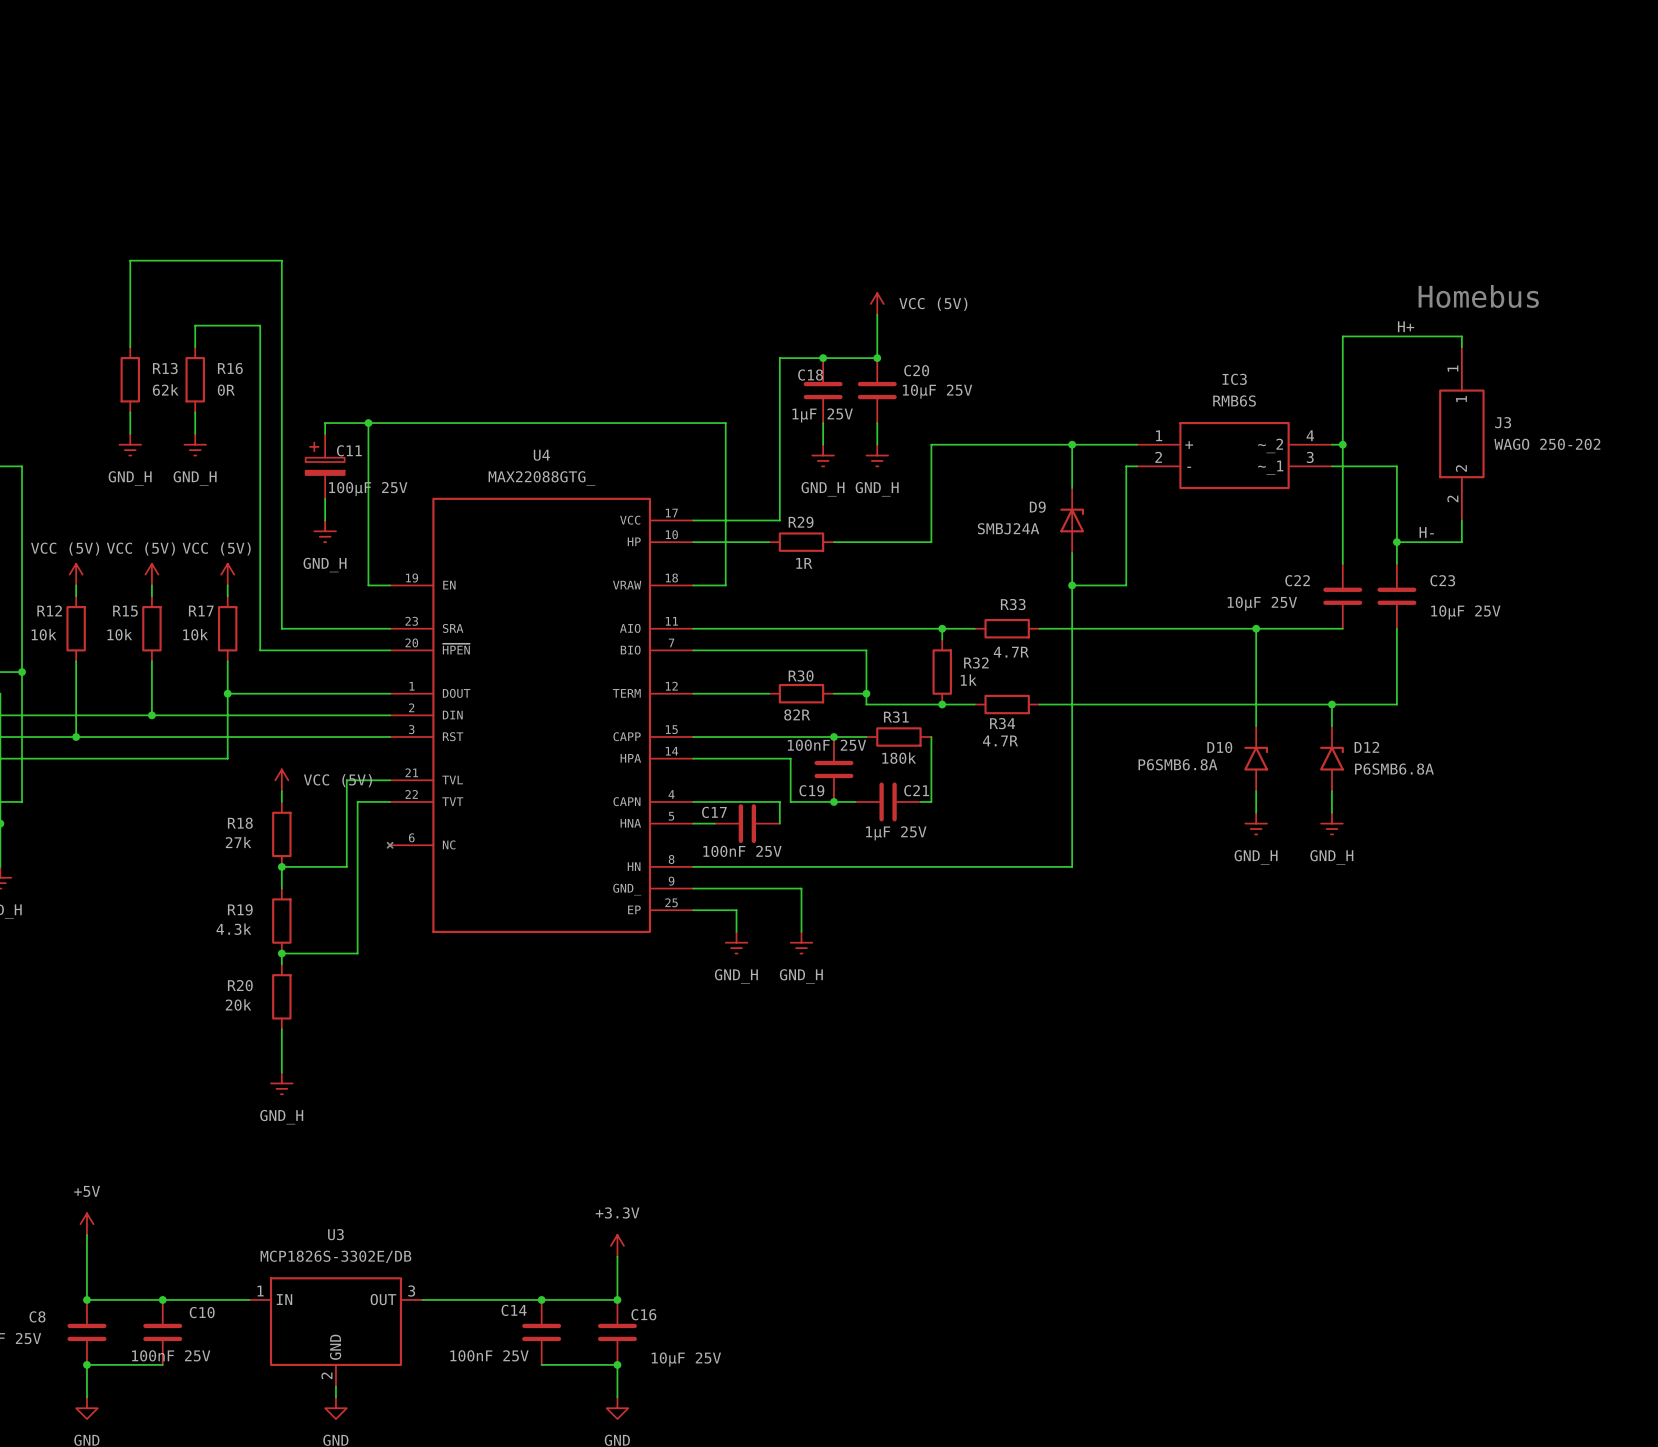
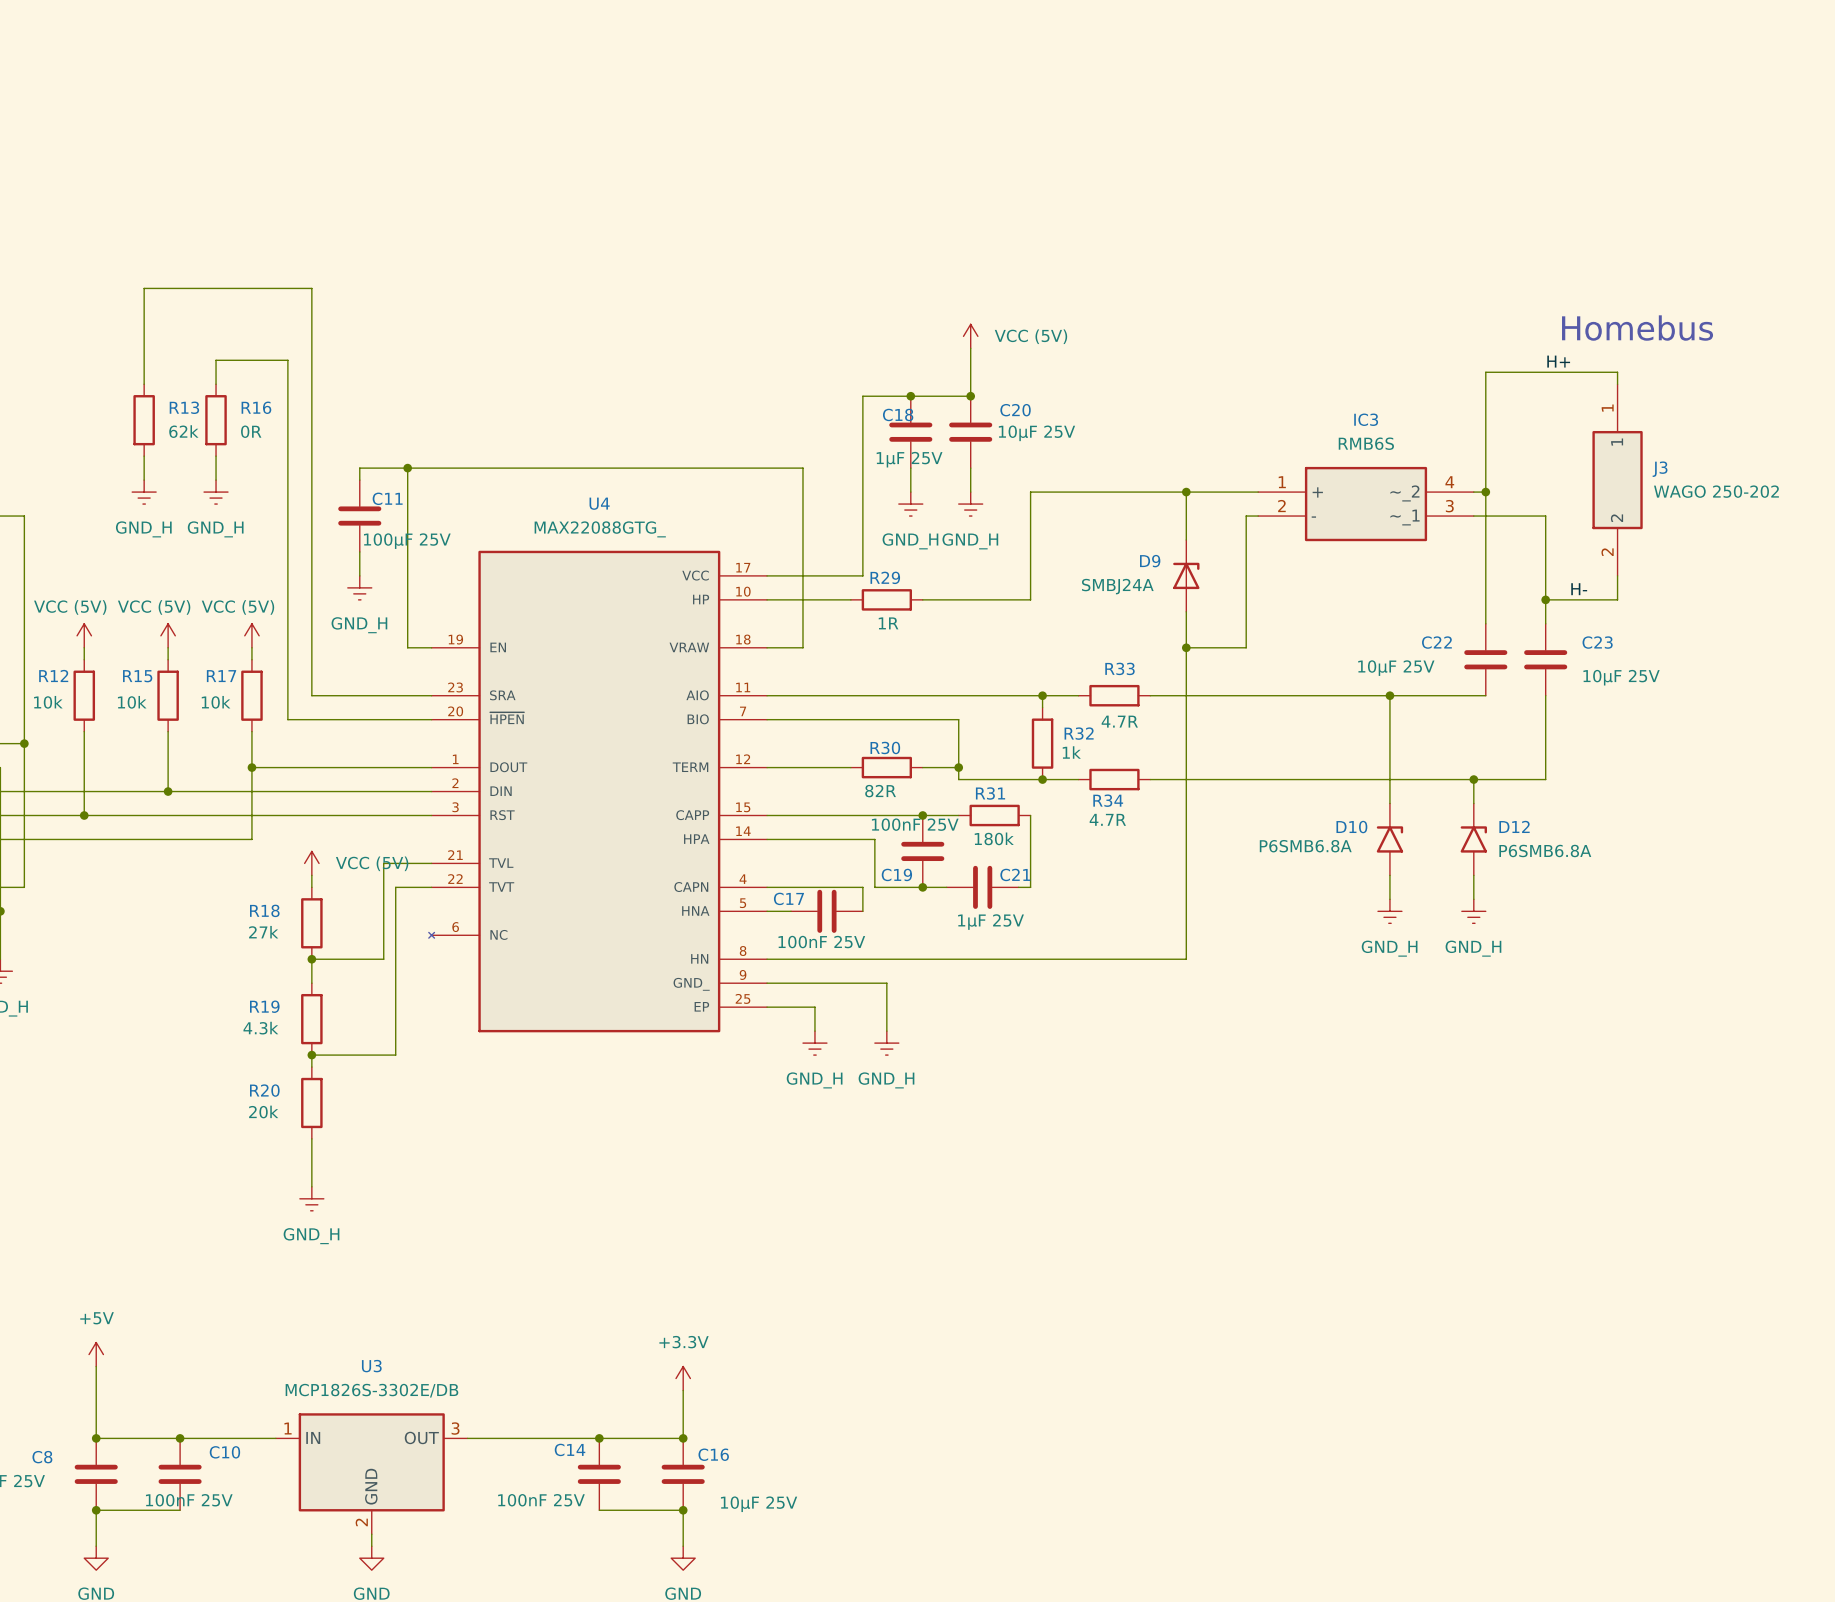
C11 symbol: [305, 433, 345, 499] -> [338, 480, 382, 552]

